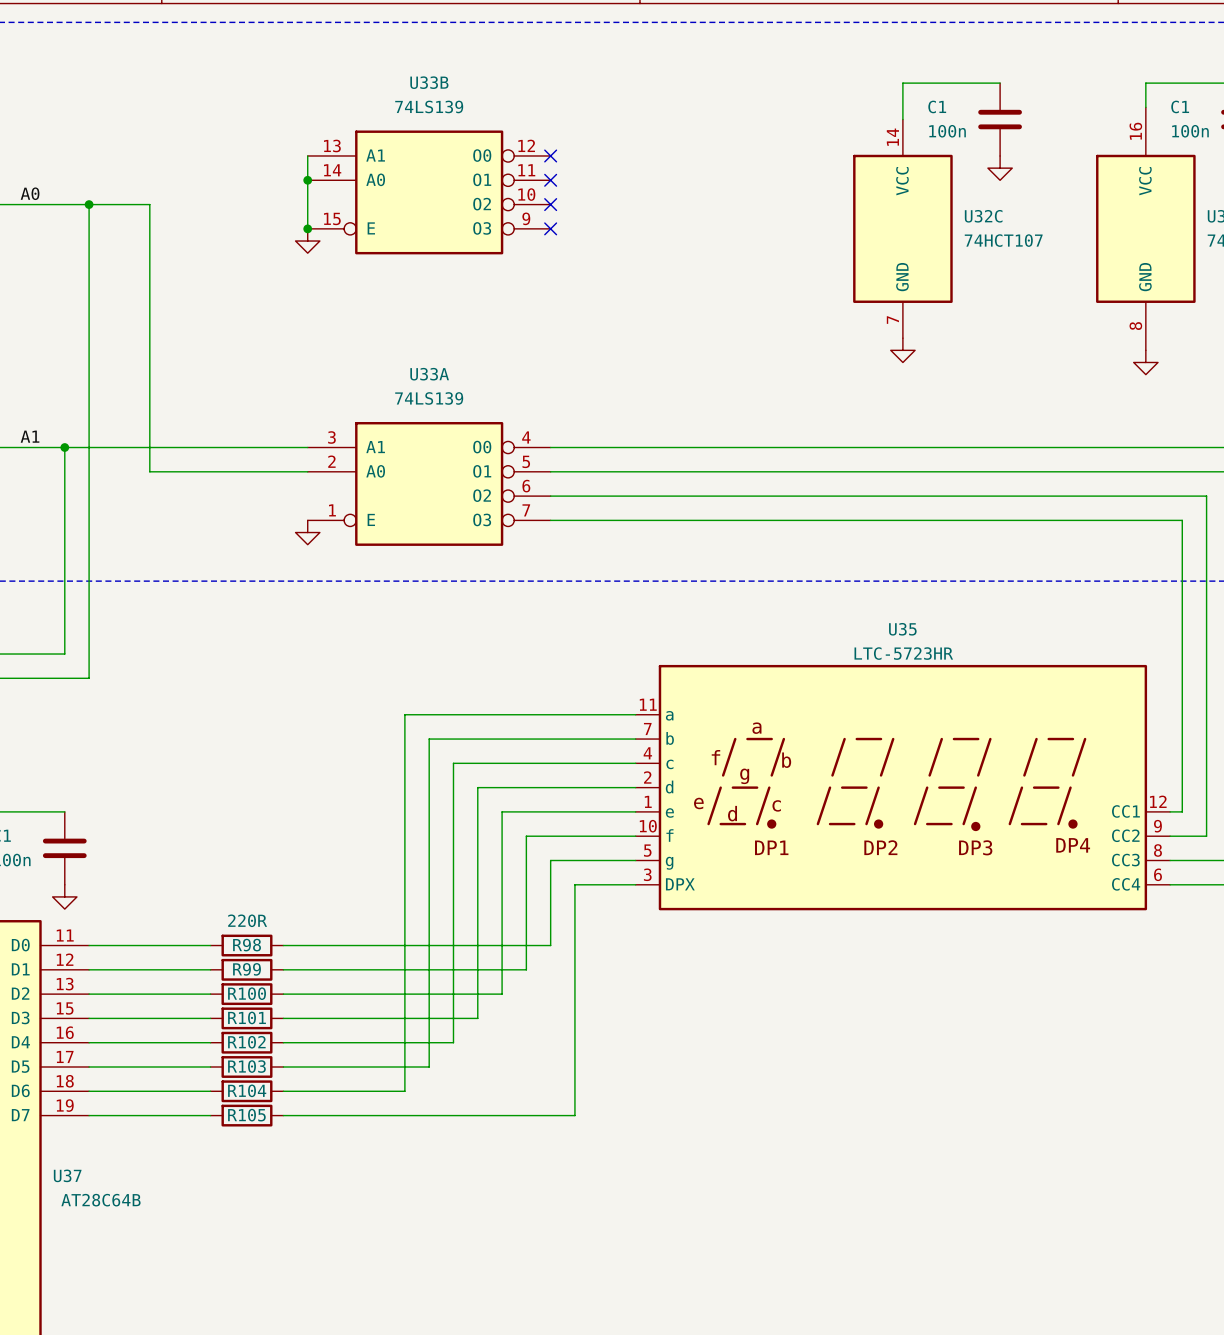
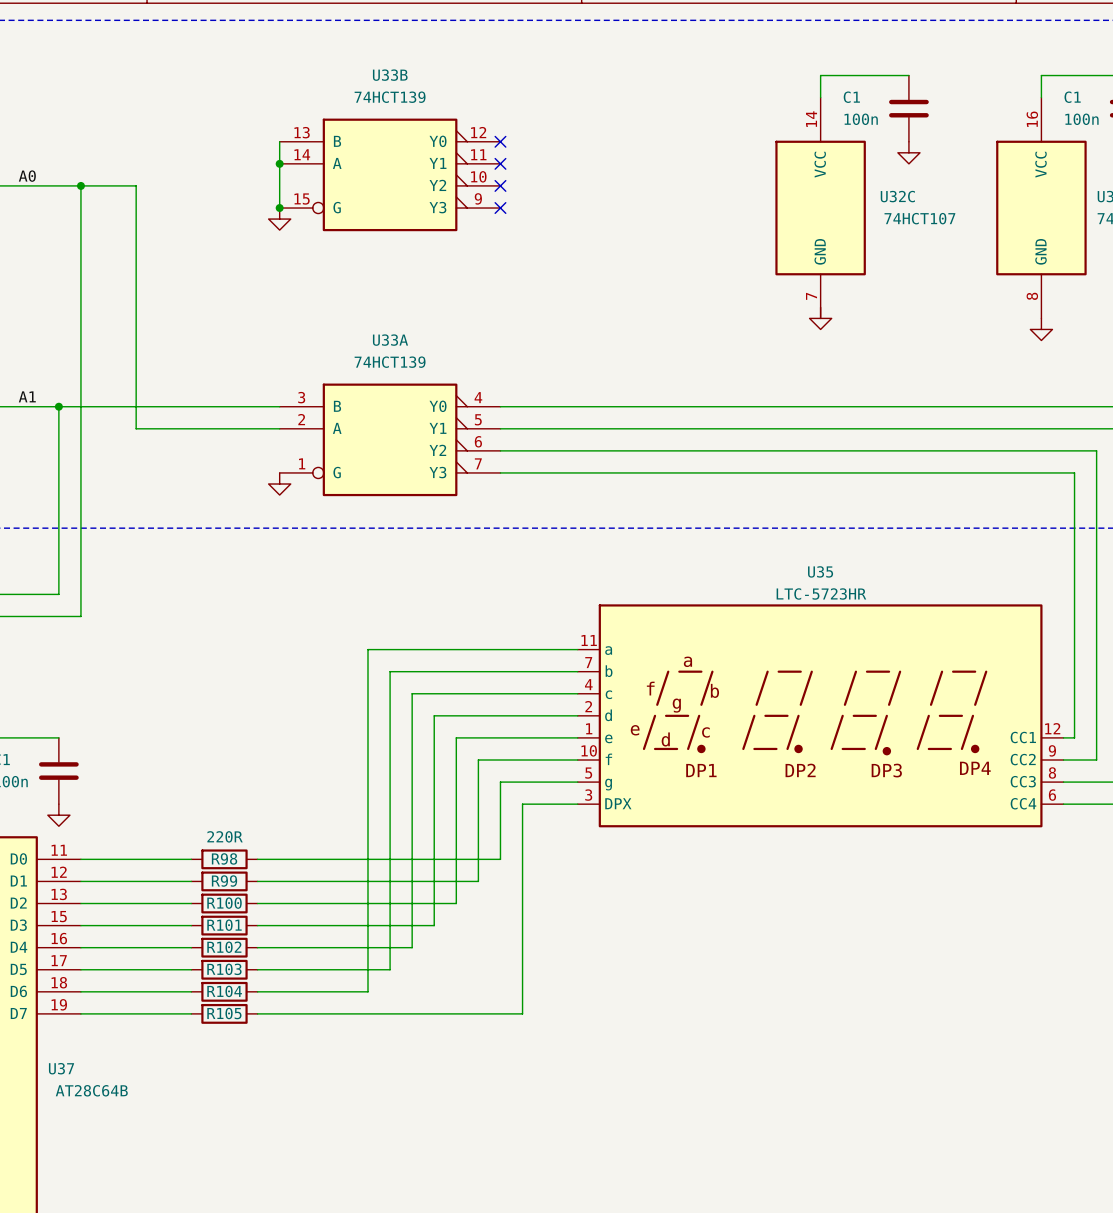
U33B value: 74LS139 (429, 106) -> 74HCT139 (390, 97)
U32C symbol: [853, 119, 953, 339] -> [775, 97, 866, 319]
U33B symbol: [307, 130, 551, 255] -> [279, 118, 501, 232]
U33A value: 74LS139 (429, 398) -> 74HCT139 (390, 362)
U33A symbol: [307, 422, 551, 546] -> [279, 383, 501, 497]

